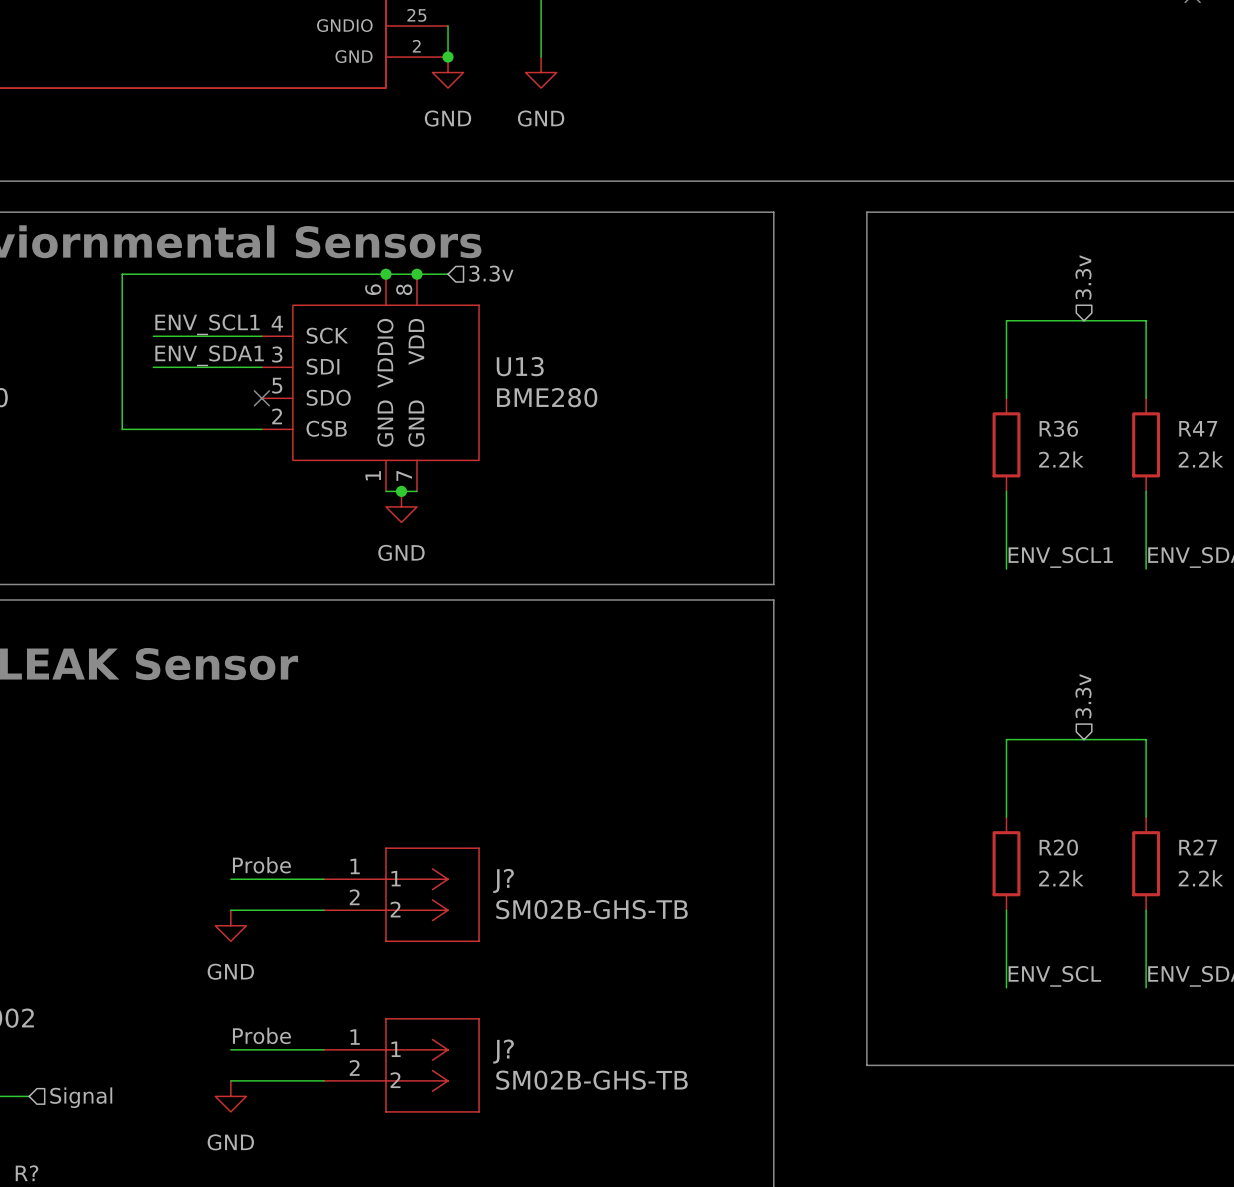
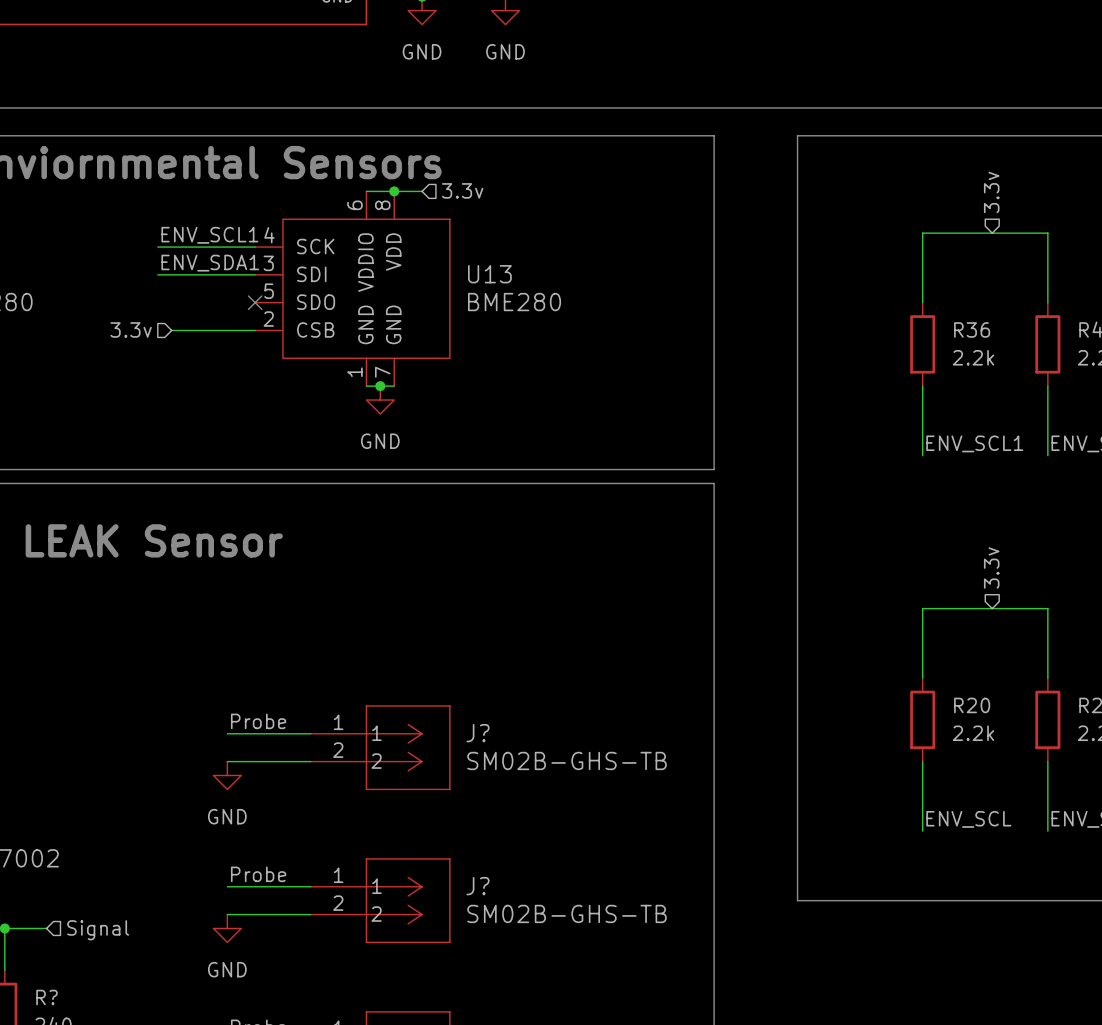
wire: (385, 274) (122, 274) (122, 429) (168, 429) -> none
junction: (385, 274) -> none
hierarchical label: none -> 3.3v (131, 329)

